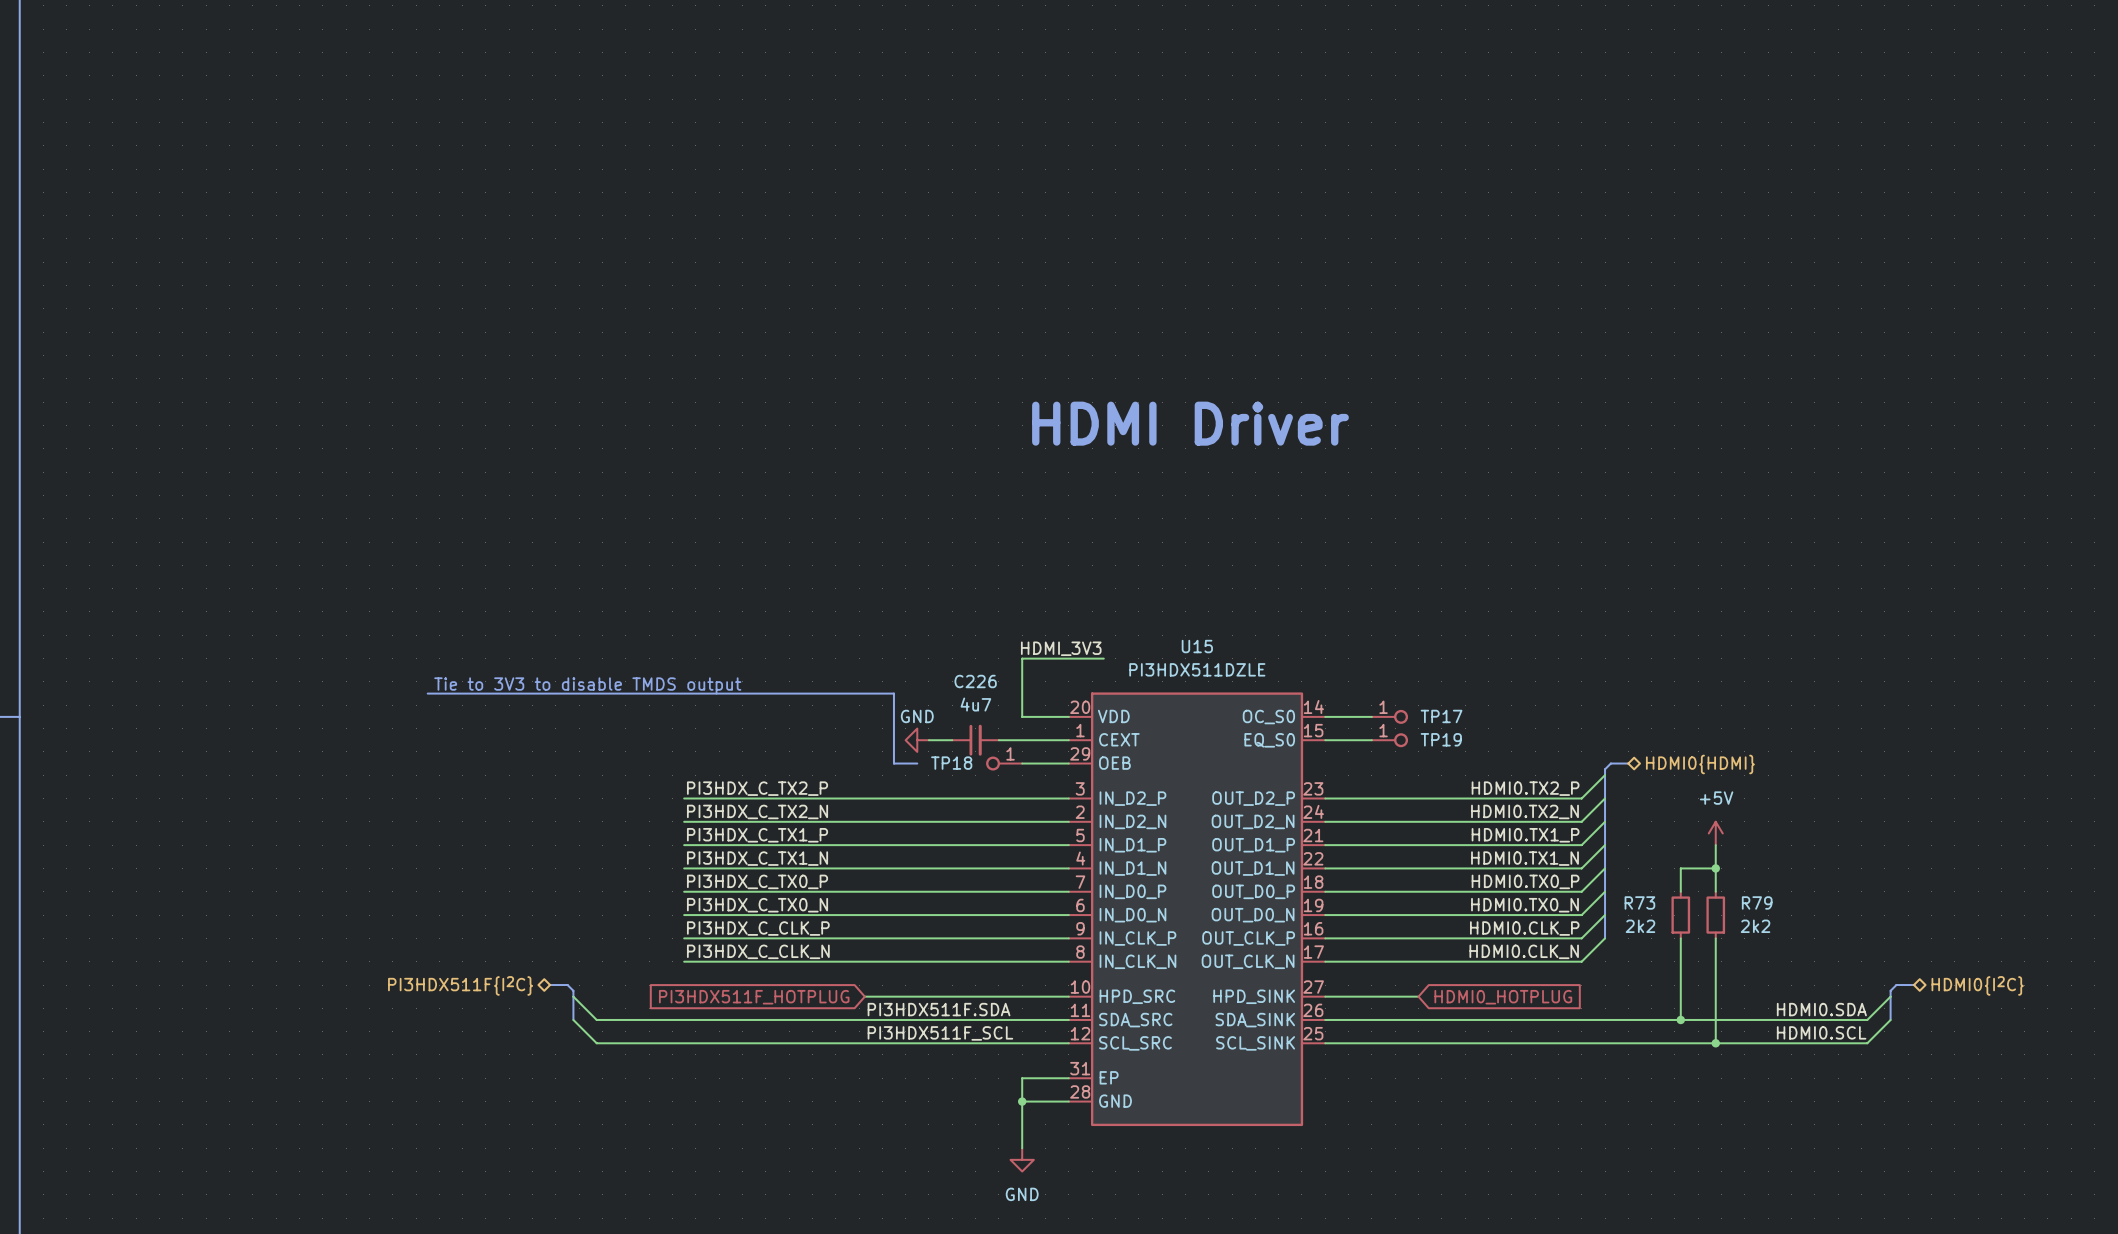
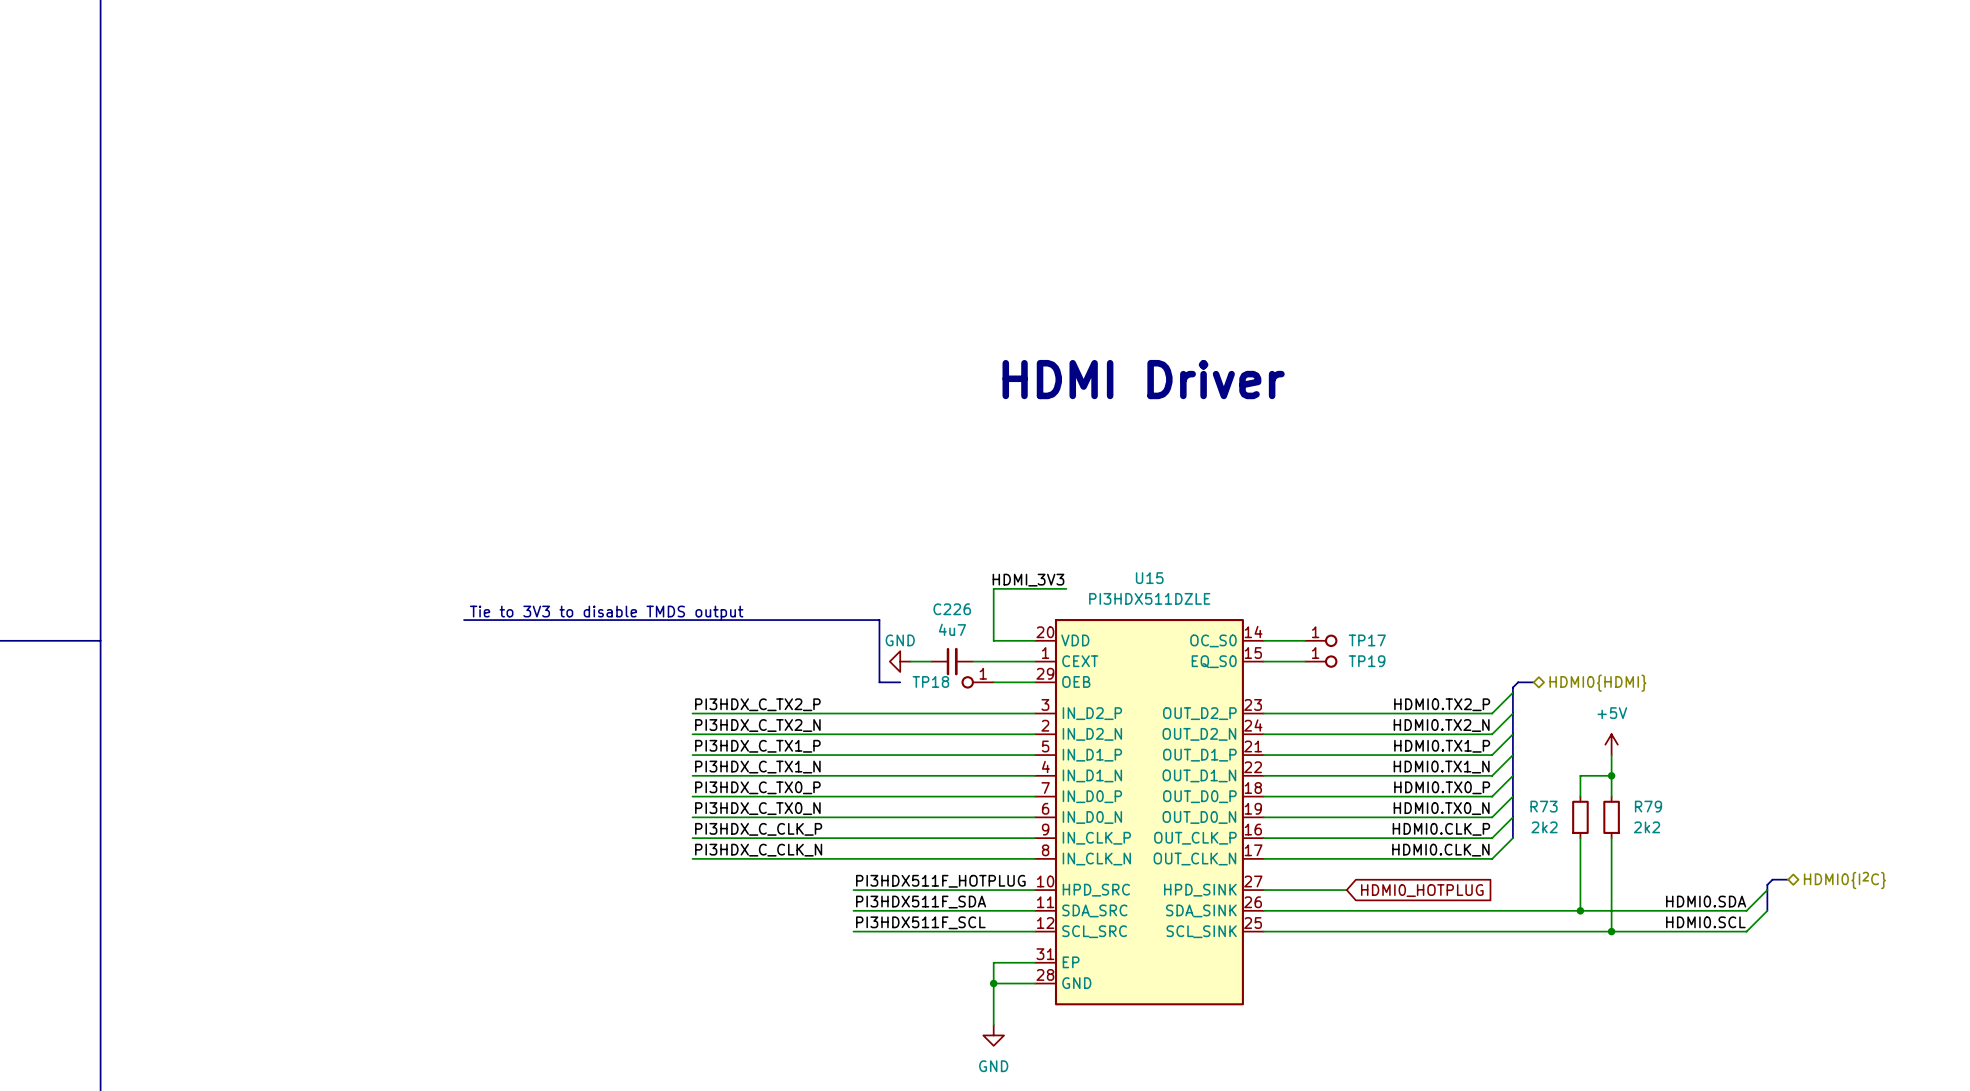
hierarchical label: PI3HDX511F{I2C} (460, 985) -> none
bus: (550, 985) (567, 985) (573, 990) (573, 1019) -> none
label: none -> PI3HDX511F_HOTPLUG (940, 881)
wire: (573, 996) (596, 1019) (864, 1019) -> none
global label: PI3HDX511F_HOTPLUG (754, 997) -> none
label: PI3HDX511F.SDA (939, 1009) -> PI3HDX511F_SDA (921, 902)
wire: (573, 1019) (596, 1043) (864, 1043) -> none

